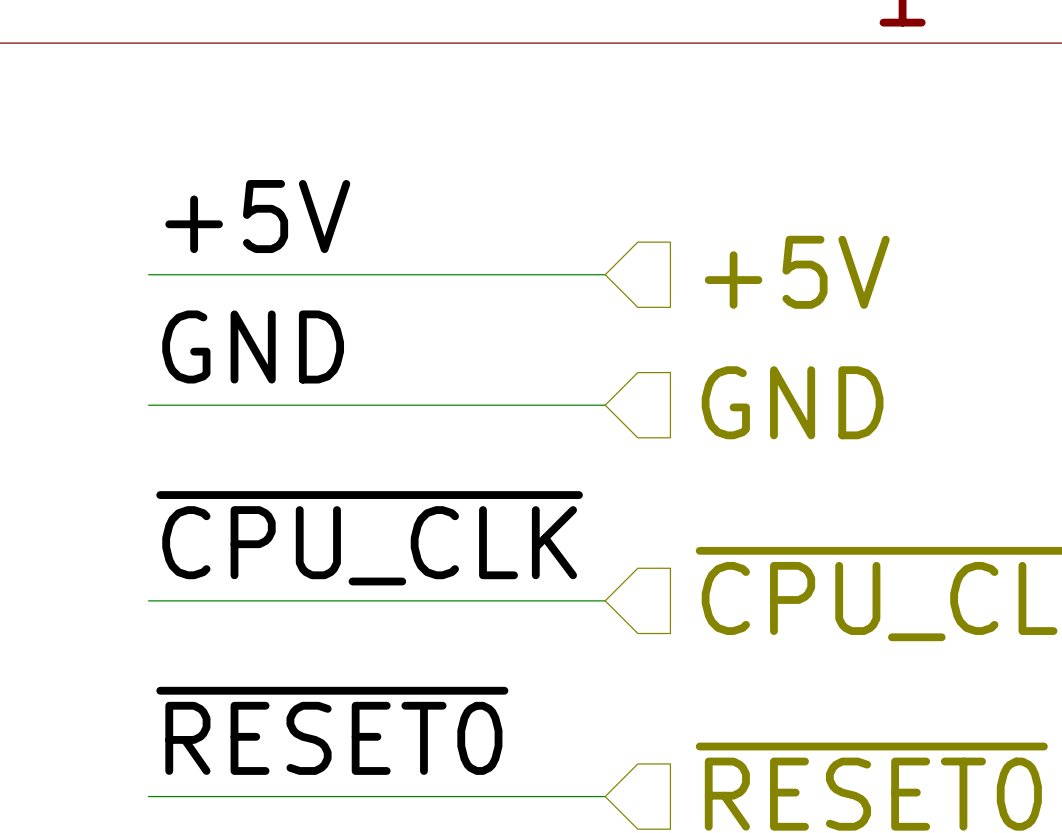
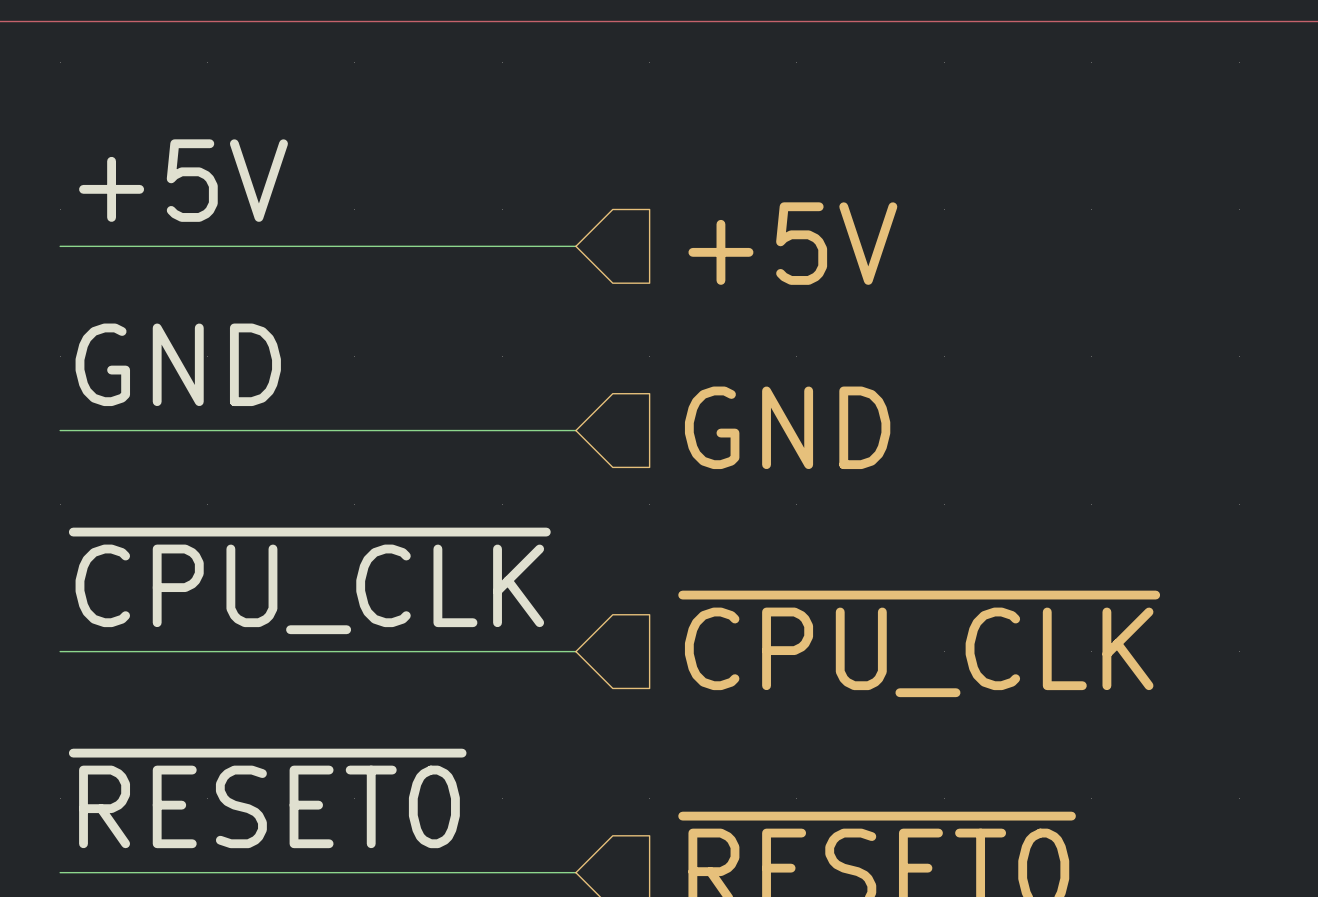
label position: +5V (257, 216) -> +5V (183, 180)
hierarchical label position: +5V (797, 272) -> +5V (792, 243)
wire: (148, 274) (605, 274) -> (60, 246) (575, 246)

